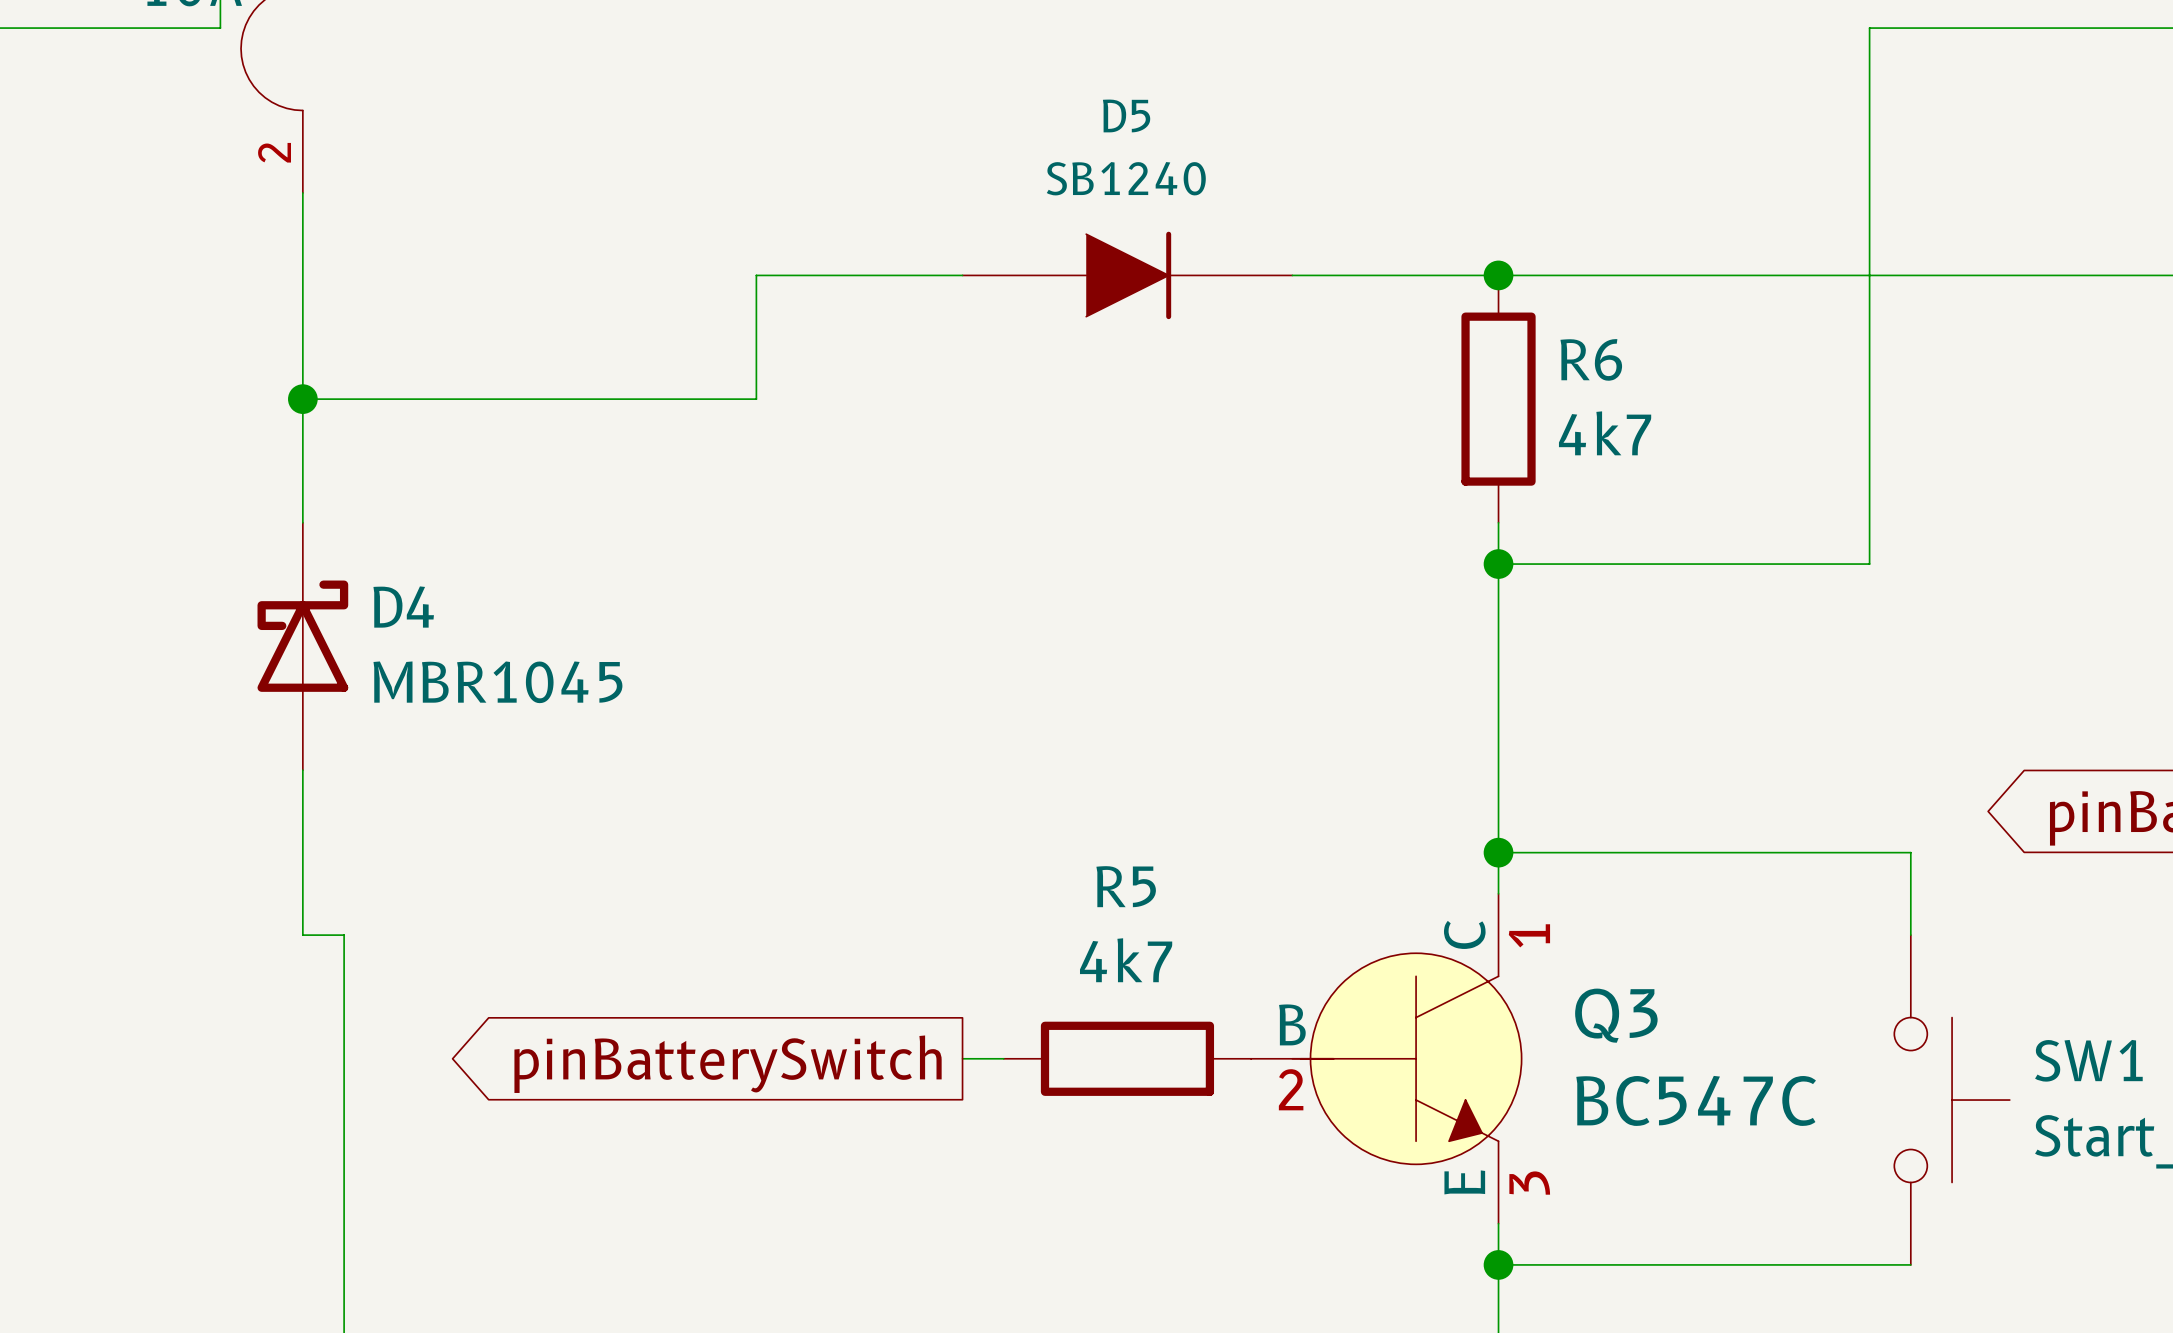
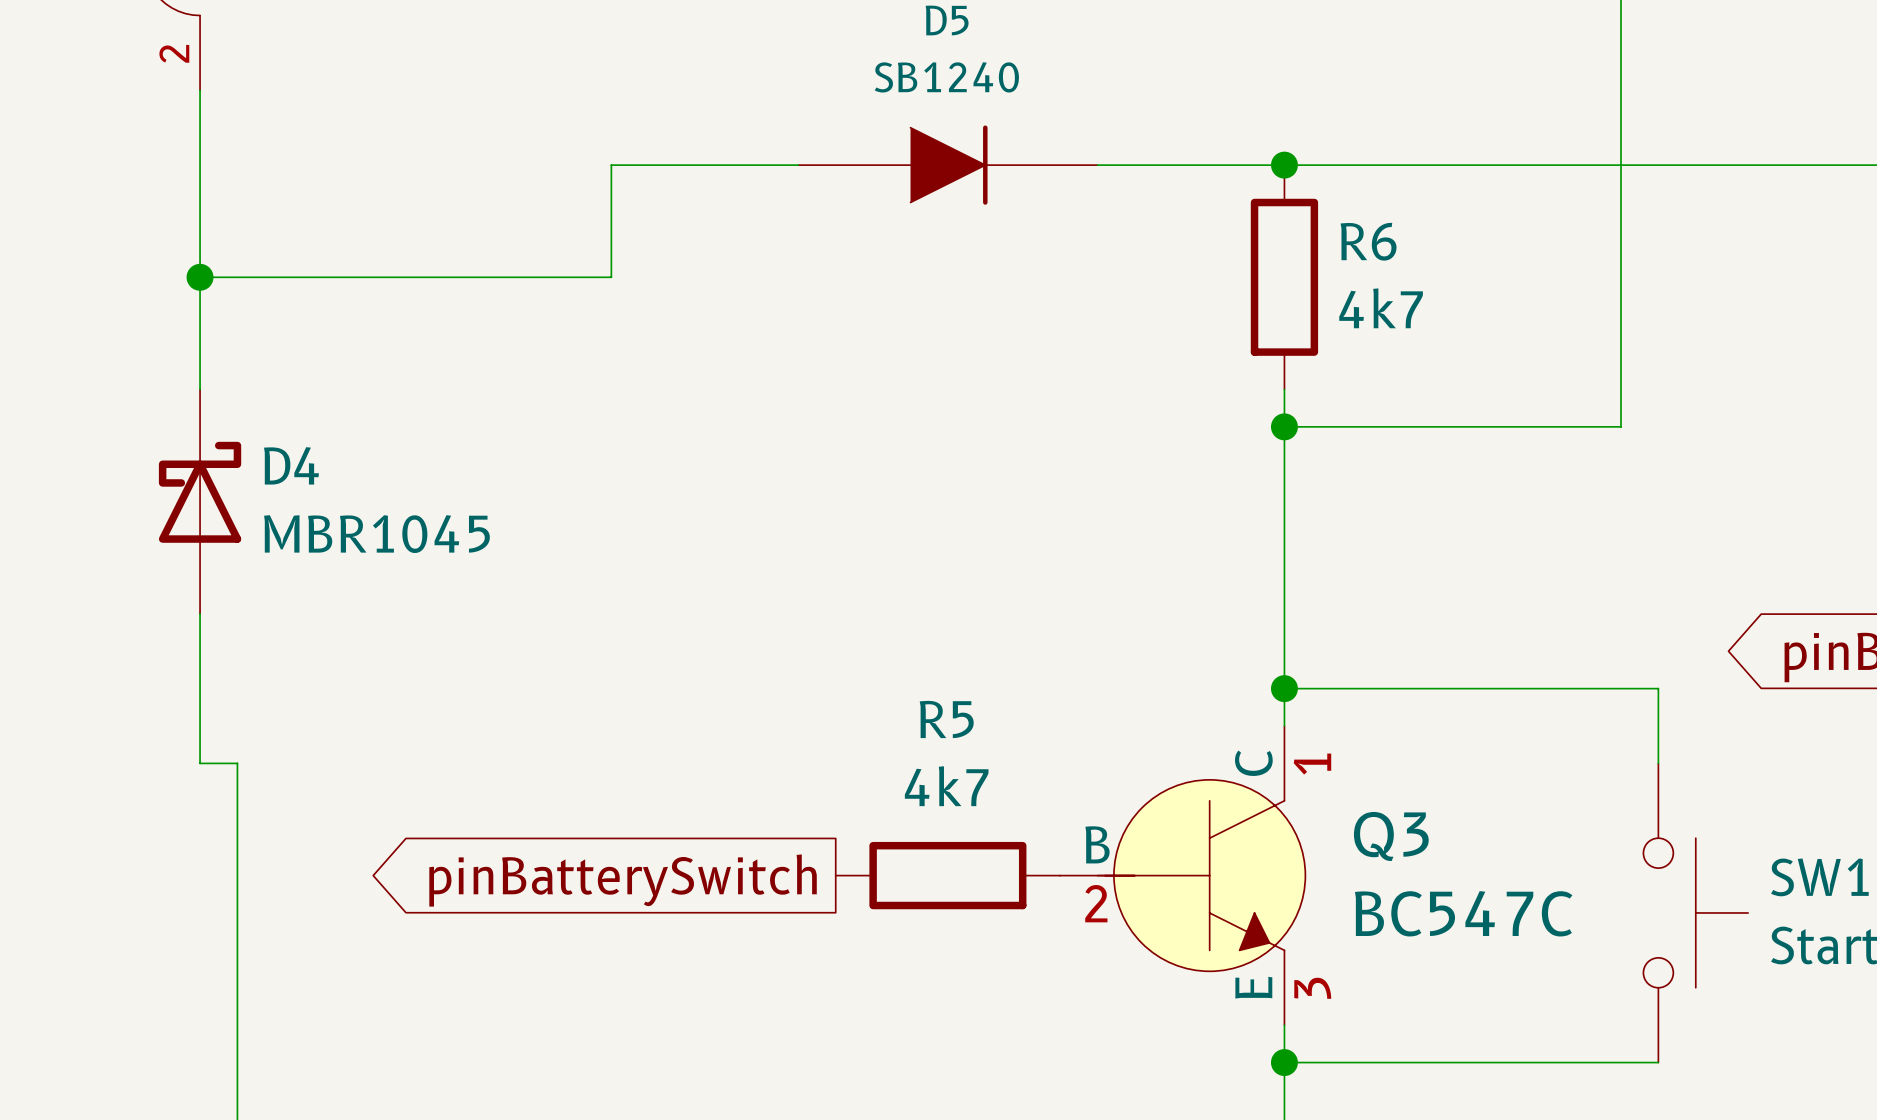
wire: (962, 1058) (1003, 1058) -> none
global label position: pinBatterySwitch (728, 1064) -> pinBatterySwitch (623, 880)

